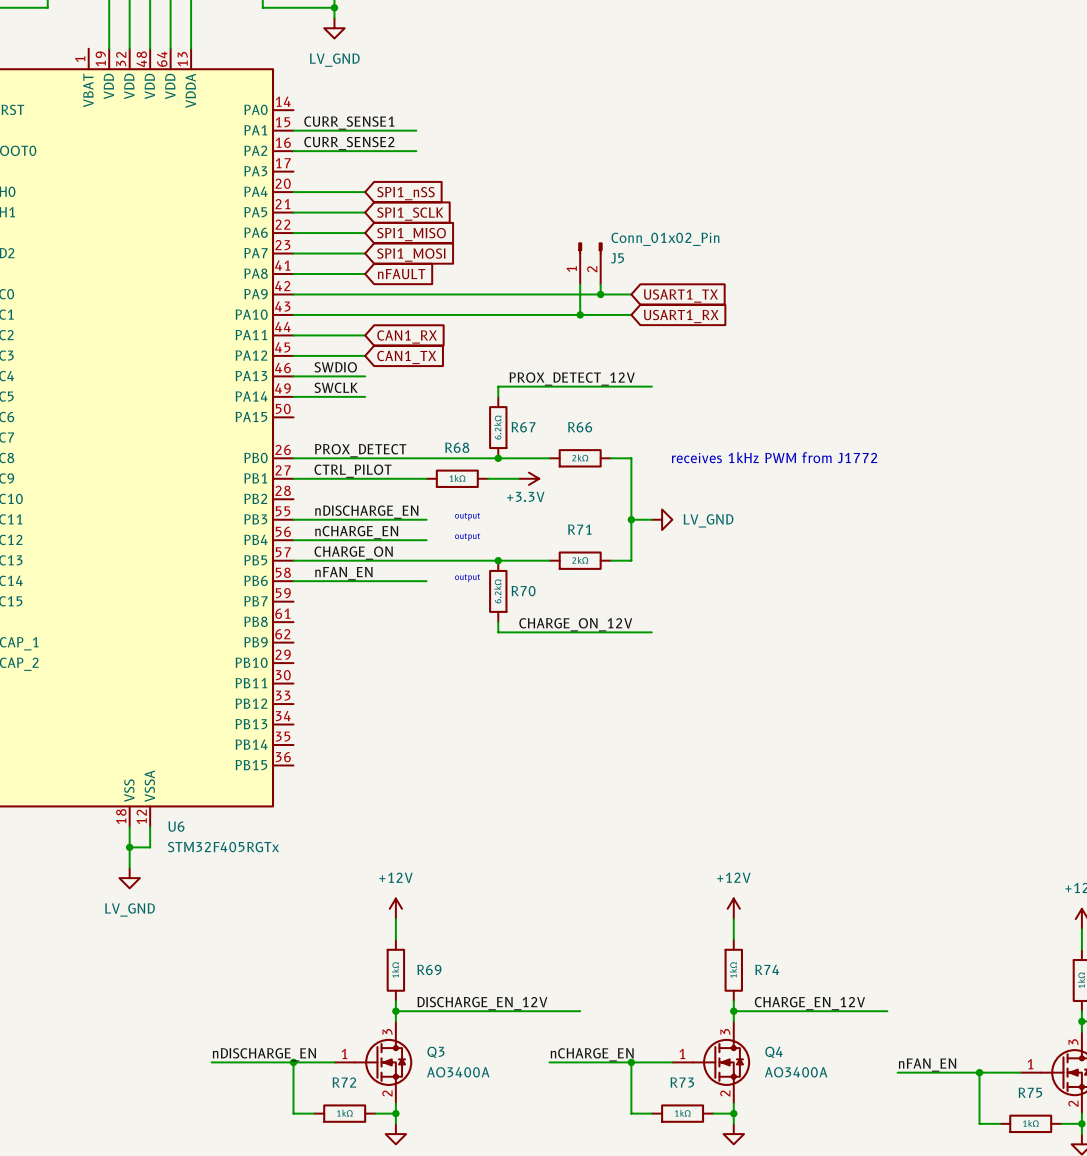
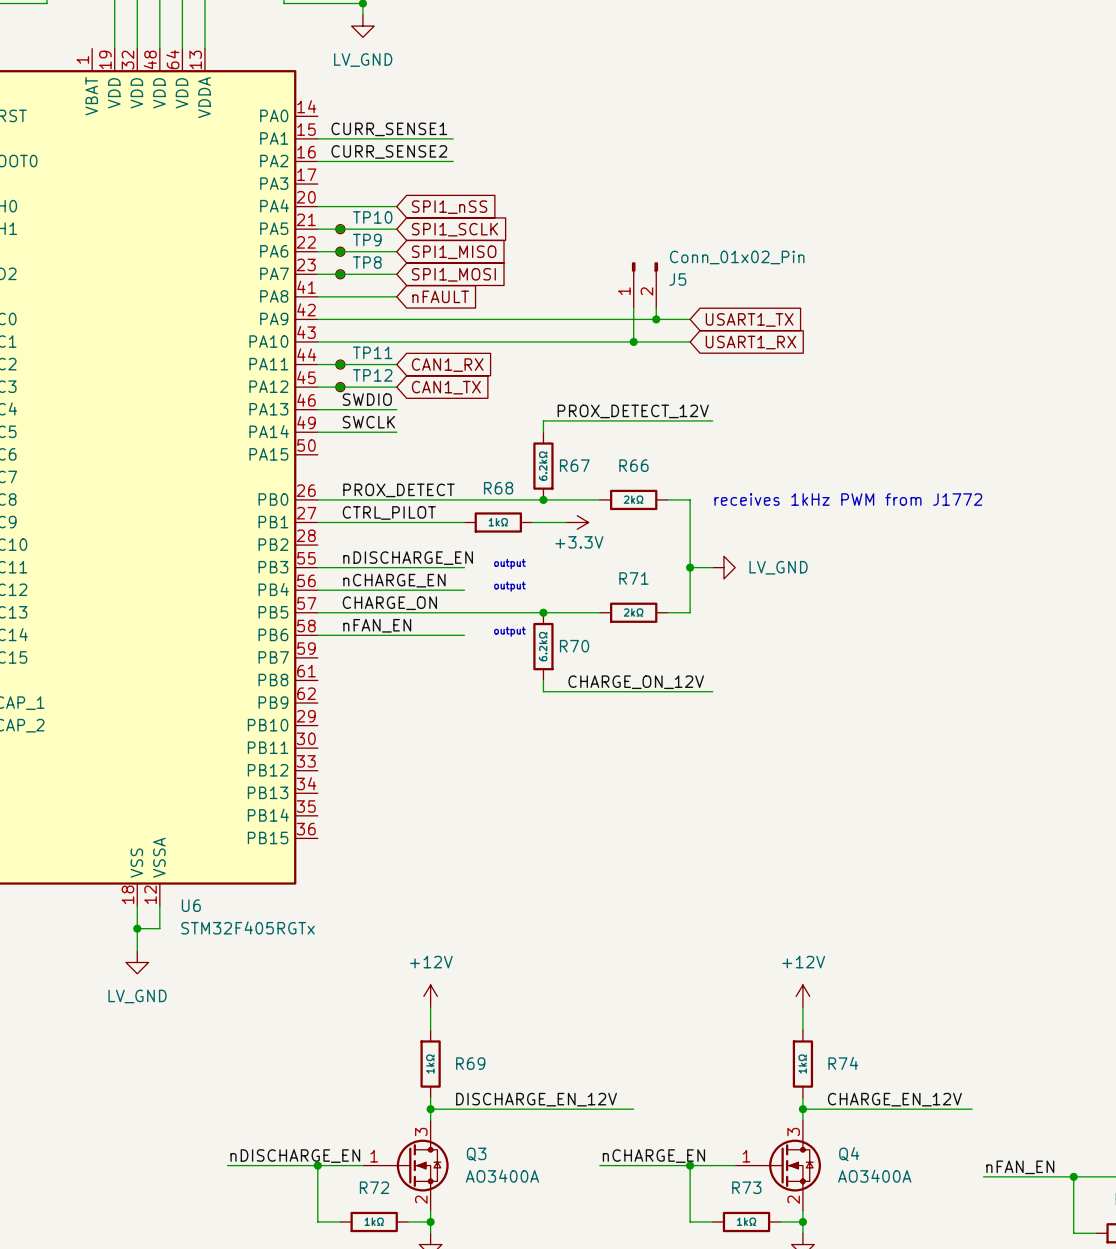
junction: none -> (340, 229)
TP10: none -> (340, 229)
junction: none -> (340, 251)
TP9: none -> (340, 251)
junction: none -> (340, 274)
TP8: none -> (340, 274)
junction: none -> (340, 364)
TP11: none -> (340, 364)
junction: none -> (340, 387)
TP12: none -> (340, 387)

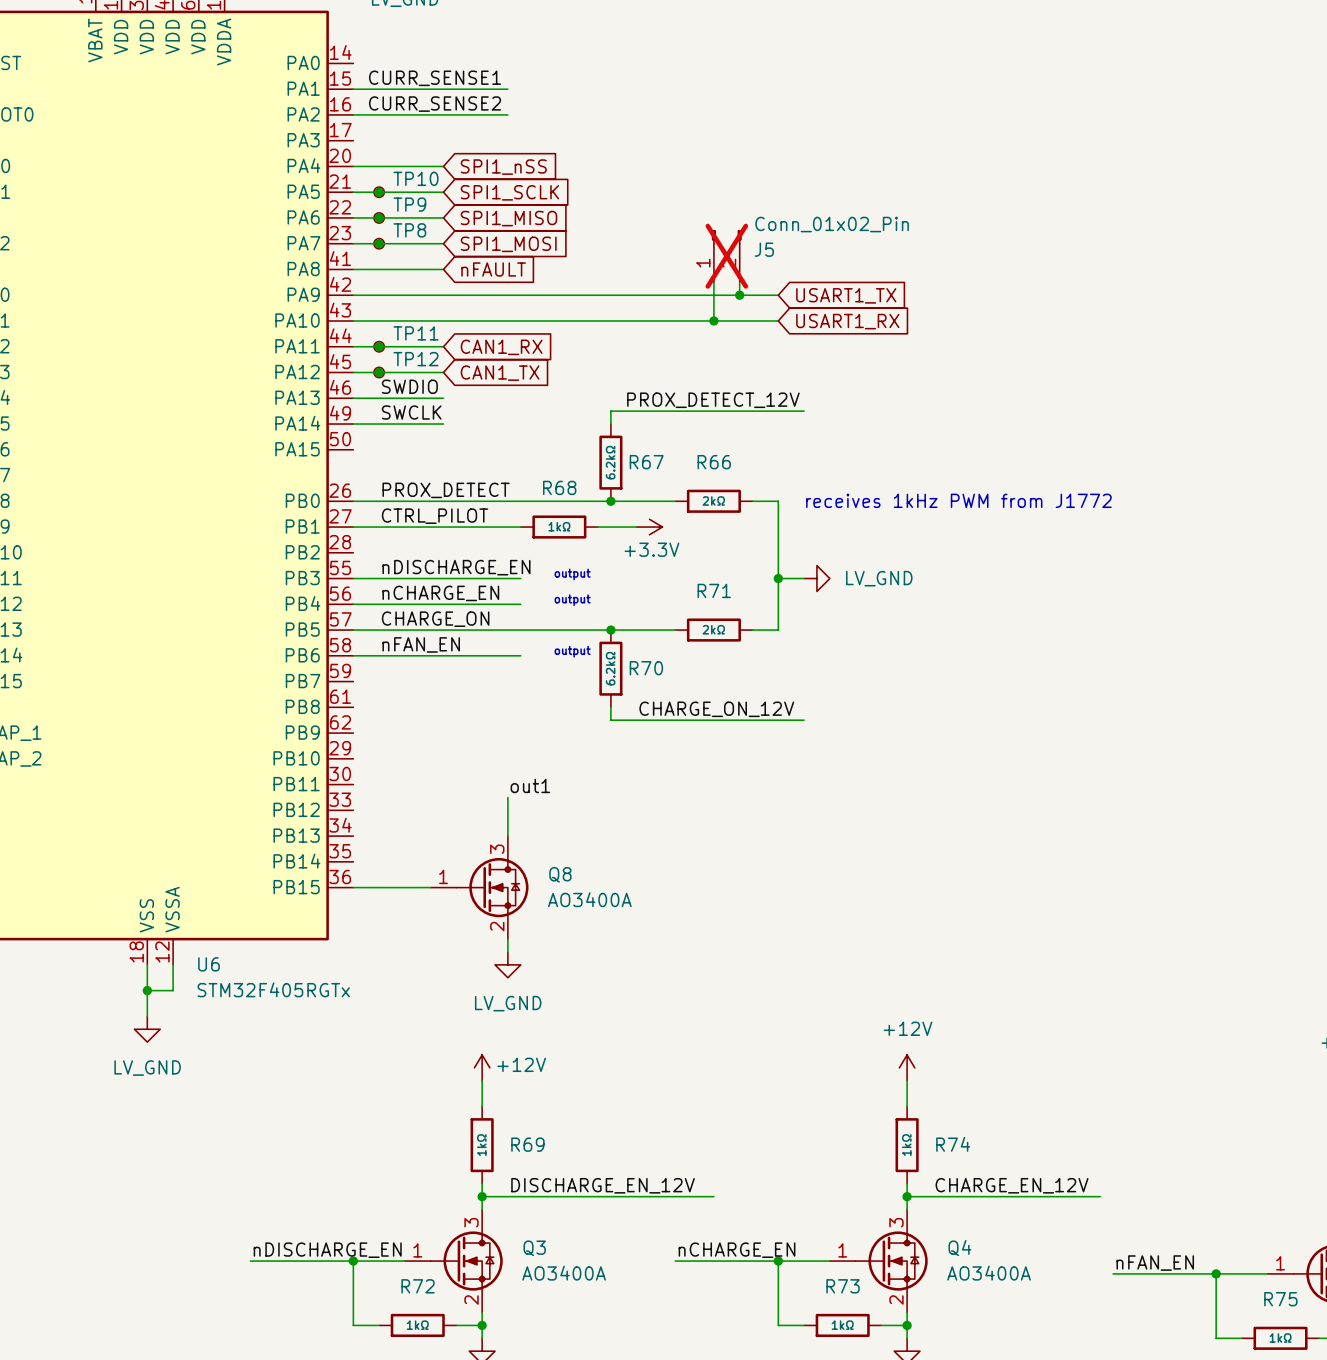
J5 do-not-place cross: none -> (726, 256)
label: none -> out1 (530, 785)
wire: none -> (507, 797) (507, 836)
wire: none -> (353, 887) (430, 887)
Q8: none -> AO3400A (479, 887)
wire: none -> (507, 939) (507, 951)
power symbol: none -> LV_GND (507, 964)
power symbol text position: +12V (431, 962) -> +12V (521, 1064)

